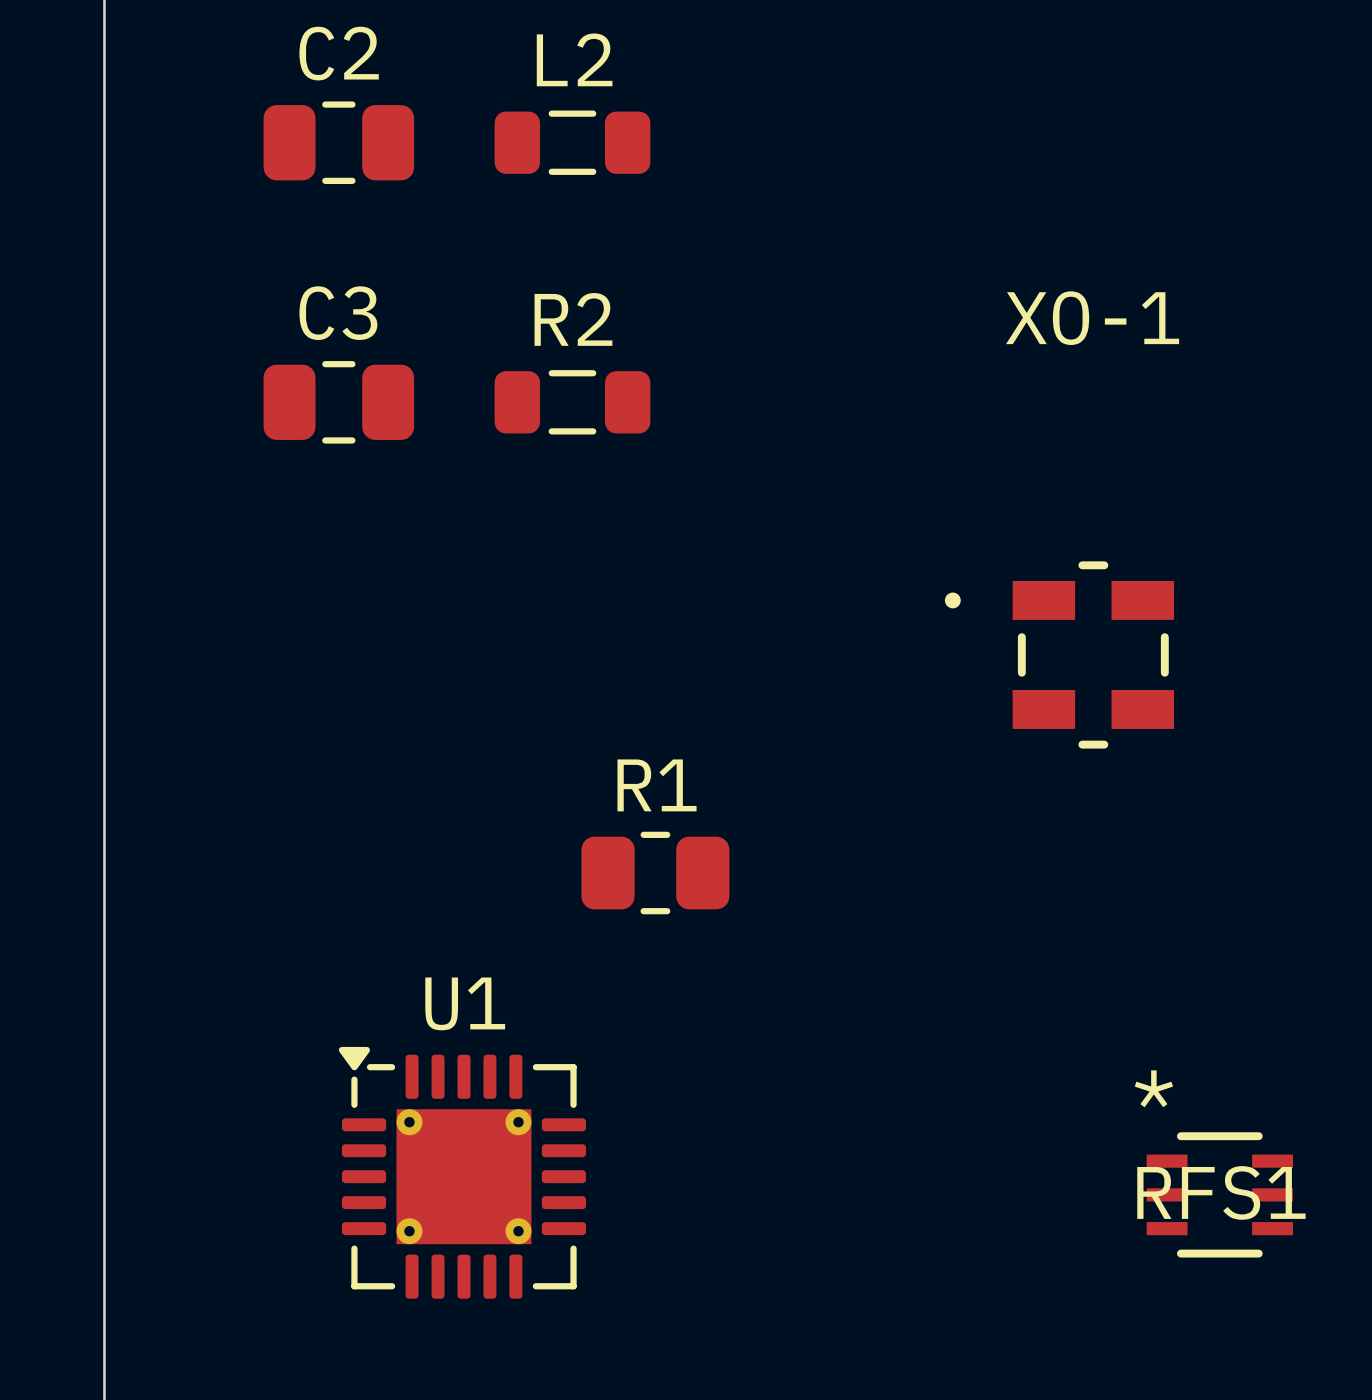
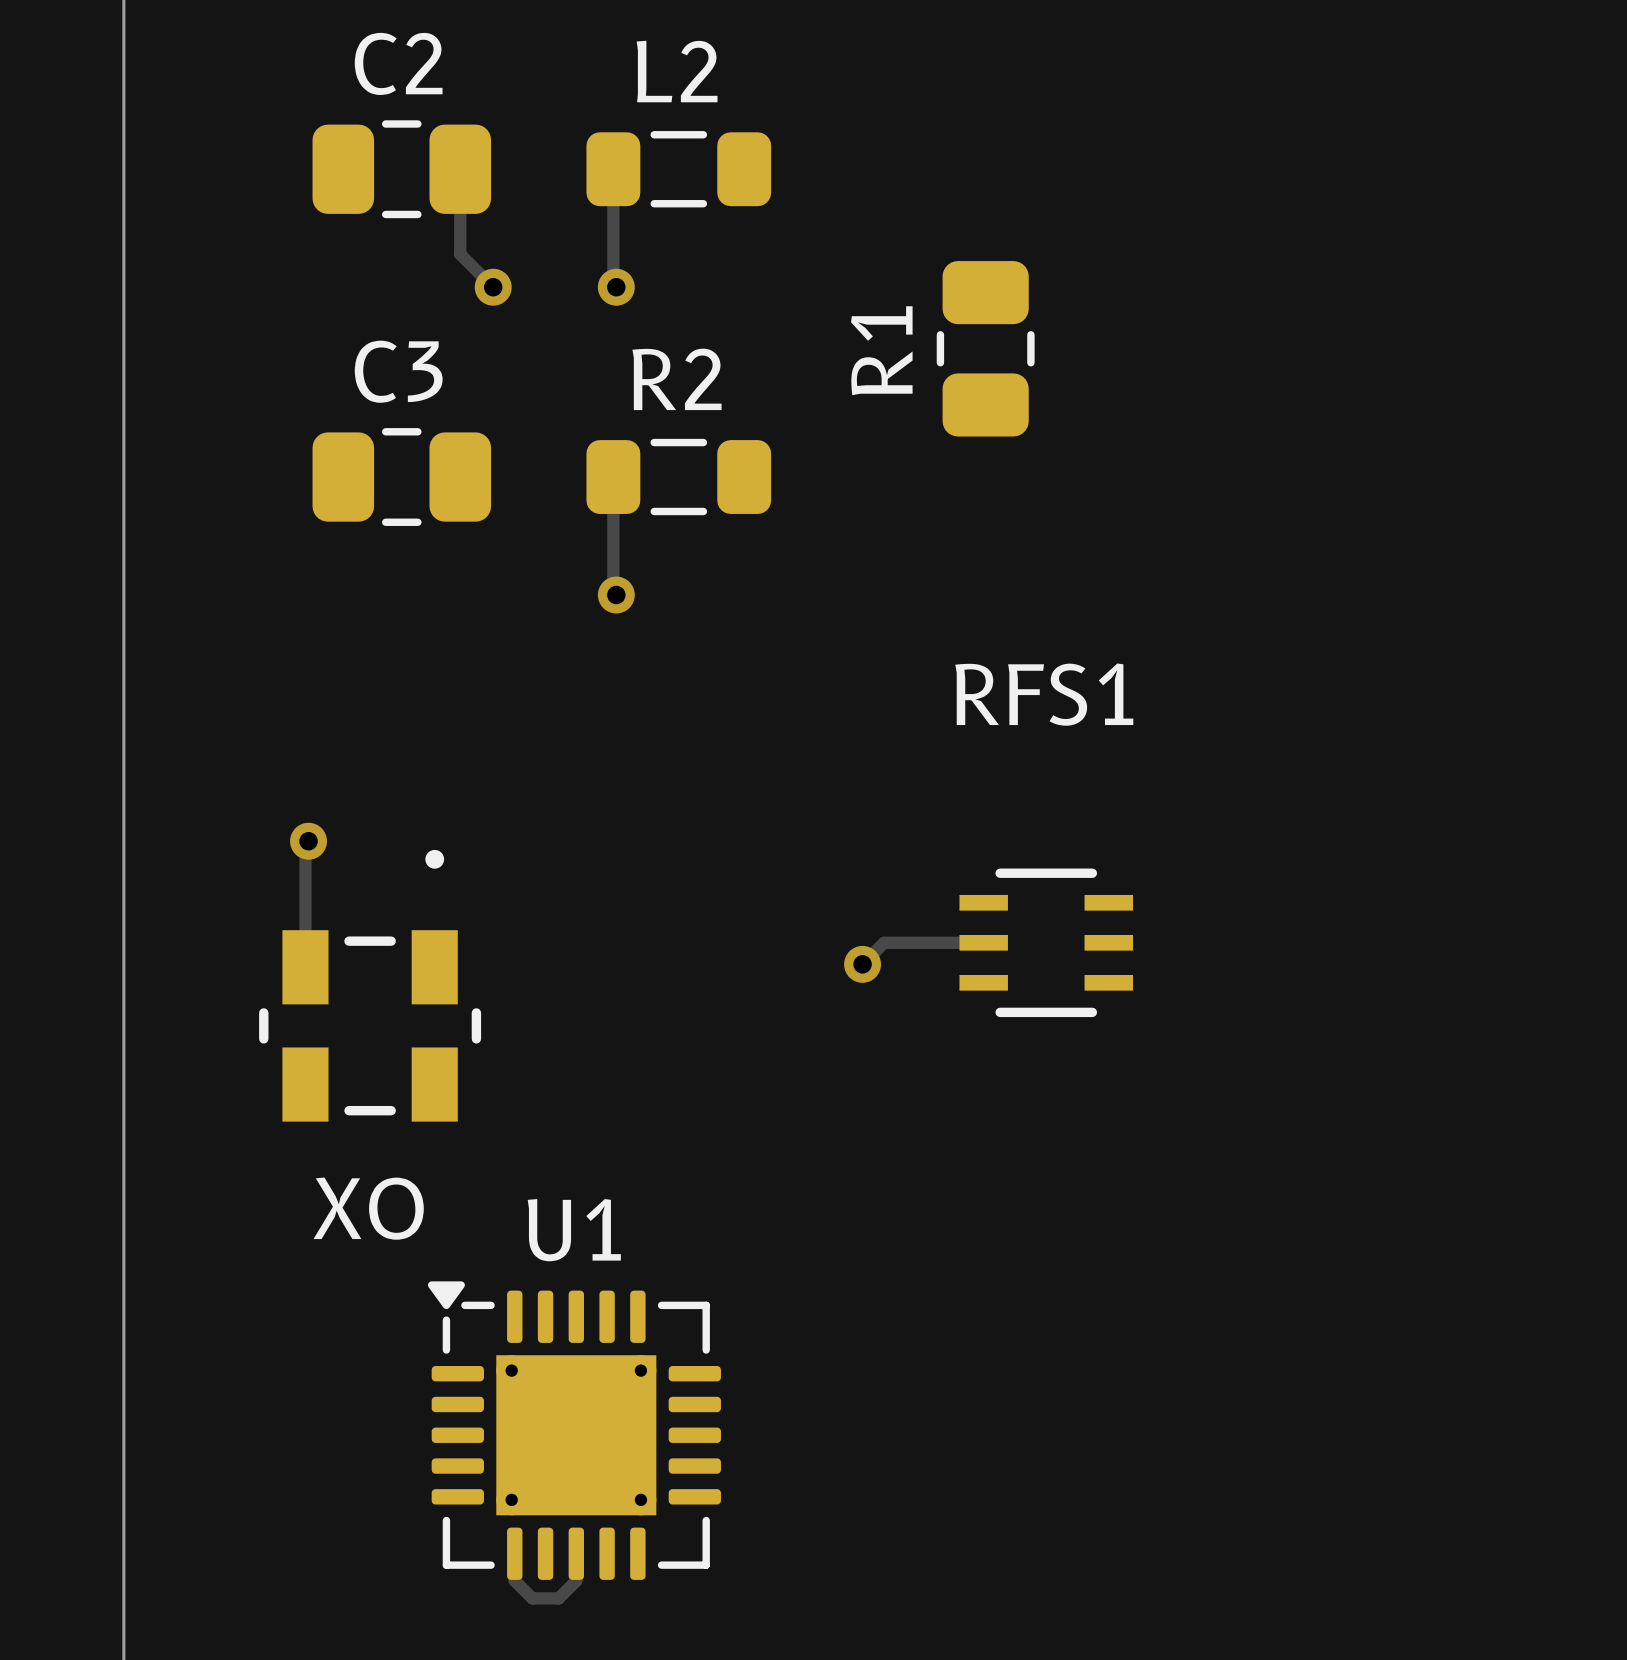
track: none -> (460, 169) (460, 254) (493, 287)
track: none -> (613, 169) (613, 284) (616, 287)
via: none -> (493, 287)
via: none -> (616, 287)
track: none -> (613, 477) (613, 592) (616, 595)
via: none -> (616, 595)
XO-1: (1059, 654) -> none
track: none -> (308, 841) (305, 844) (305, 967)
via: none -> (308, 841)
R1 name position: R1 (657, 785) -> R1 (881, 350)
track: none -> (983, 942) (884, 942) (862, 964)
via: none -> (862, 964)
XO: none -> (370, 985)
R1 rotation: 0° (655, 873) -> 90° clockwise (985, 348)
R1 position: (655, 873) -> (985, 348)
RFS1 text: * (1153, 1088) -> none
U1 position: (462, 1172) -> (574, 1430)
RFS1 name position: RFS1 (1221, 1192) -> RFS1 (1044, 694)
RFS1 position: (1219, 1194) -> (1046, 942)
track: none -> (514, 1553) (514, 1580) (532, 1598) (558, 1598) (576, 1580) (576, 1553)

